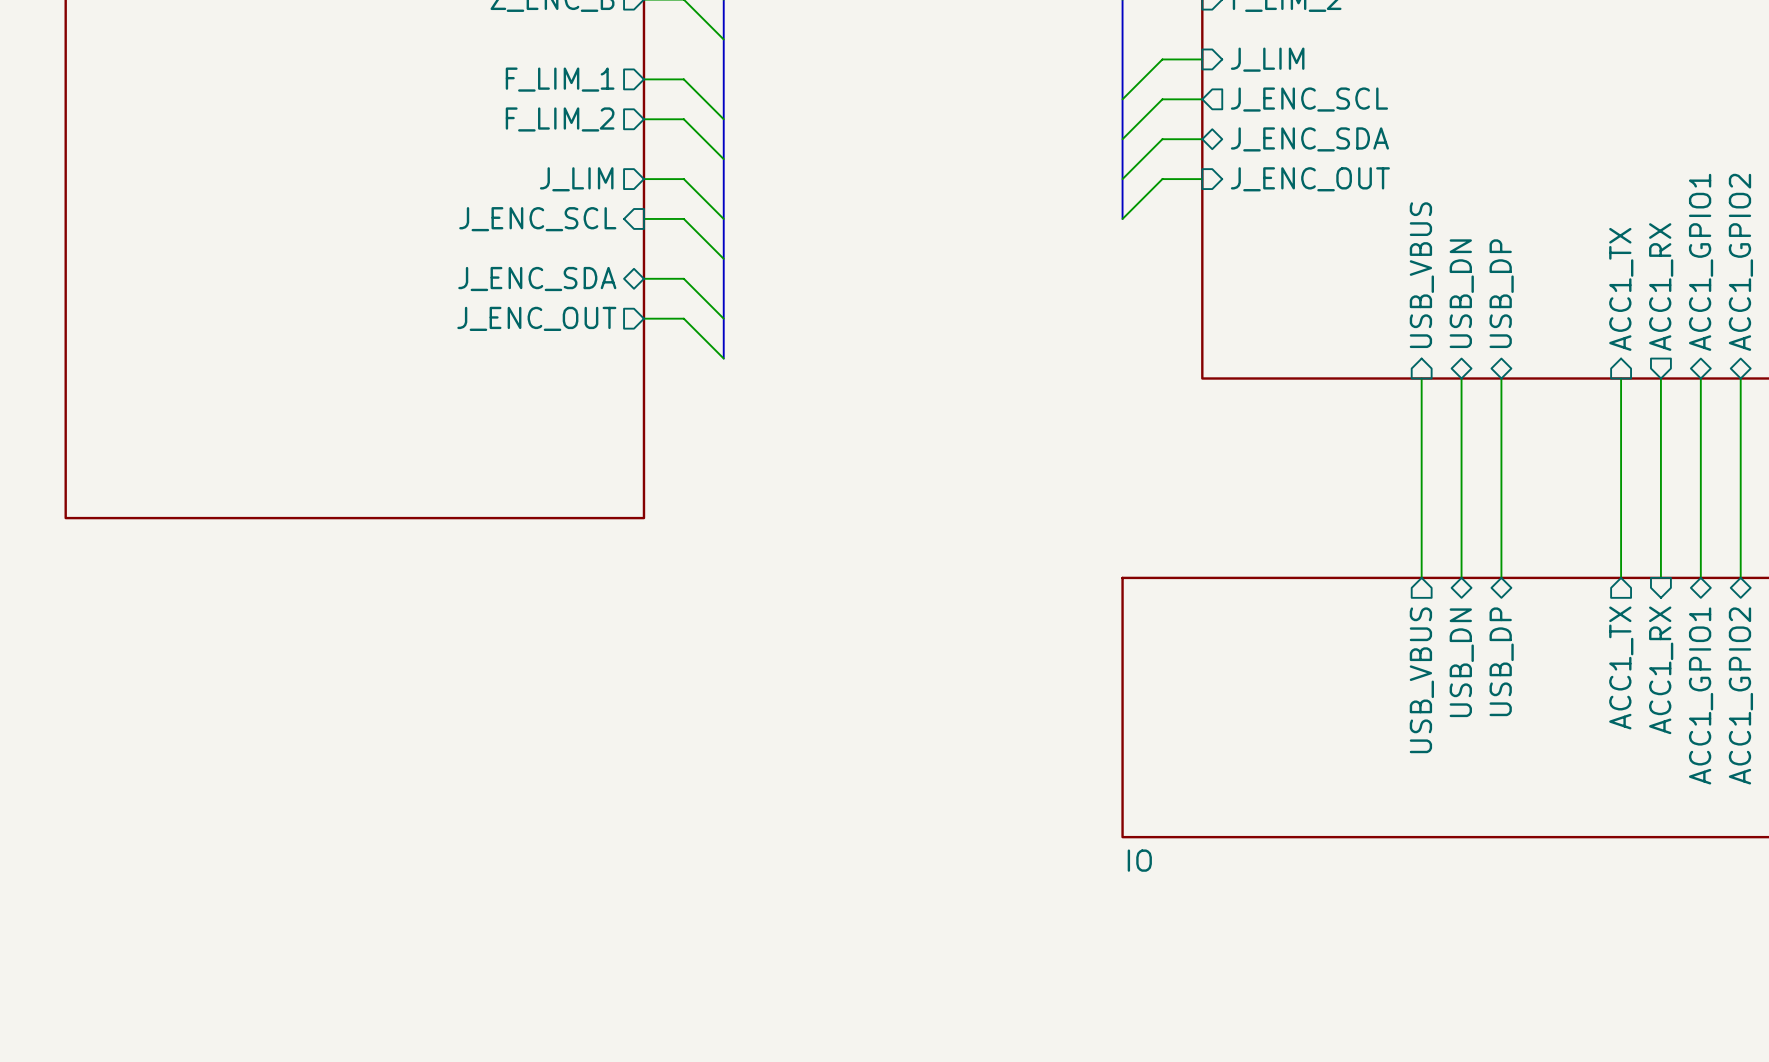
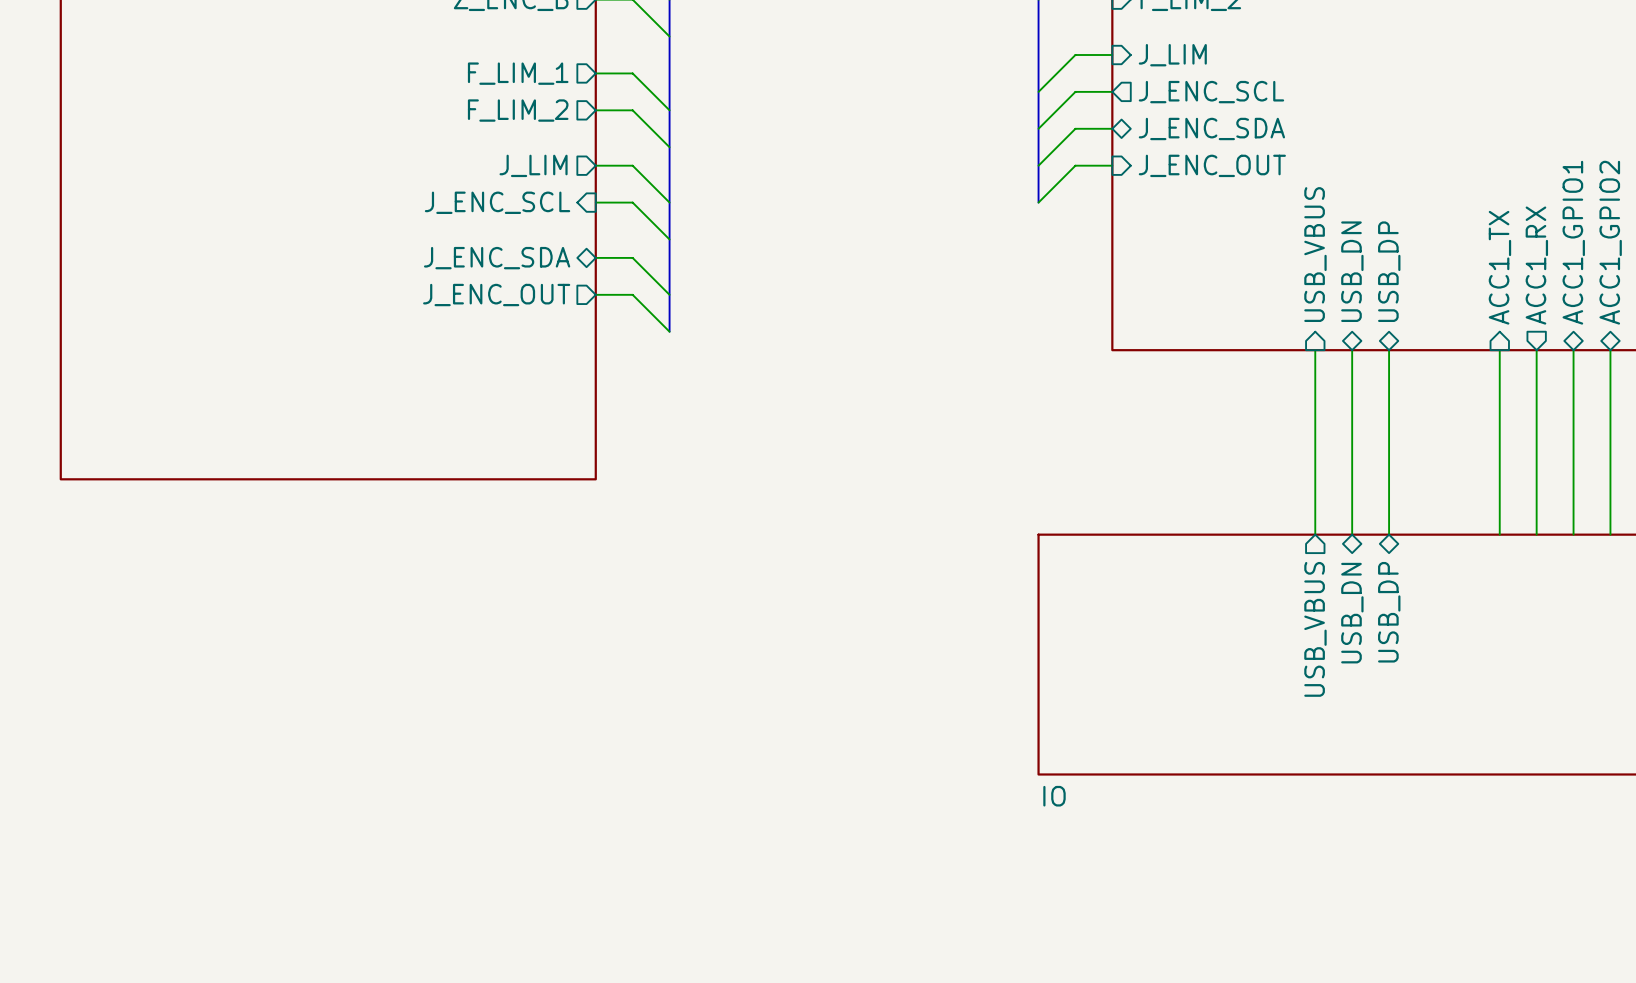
sheet pin: ACC1_TX (1621, 667) -> none
sheet pin: ACC1_RX (1661, 670) -> none
sheet pin: ACC1_GPIO1 (1701, 695) -> none
sheet pin: ACC1_GPIO2 (1740, 695) -> none

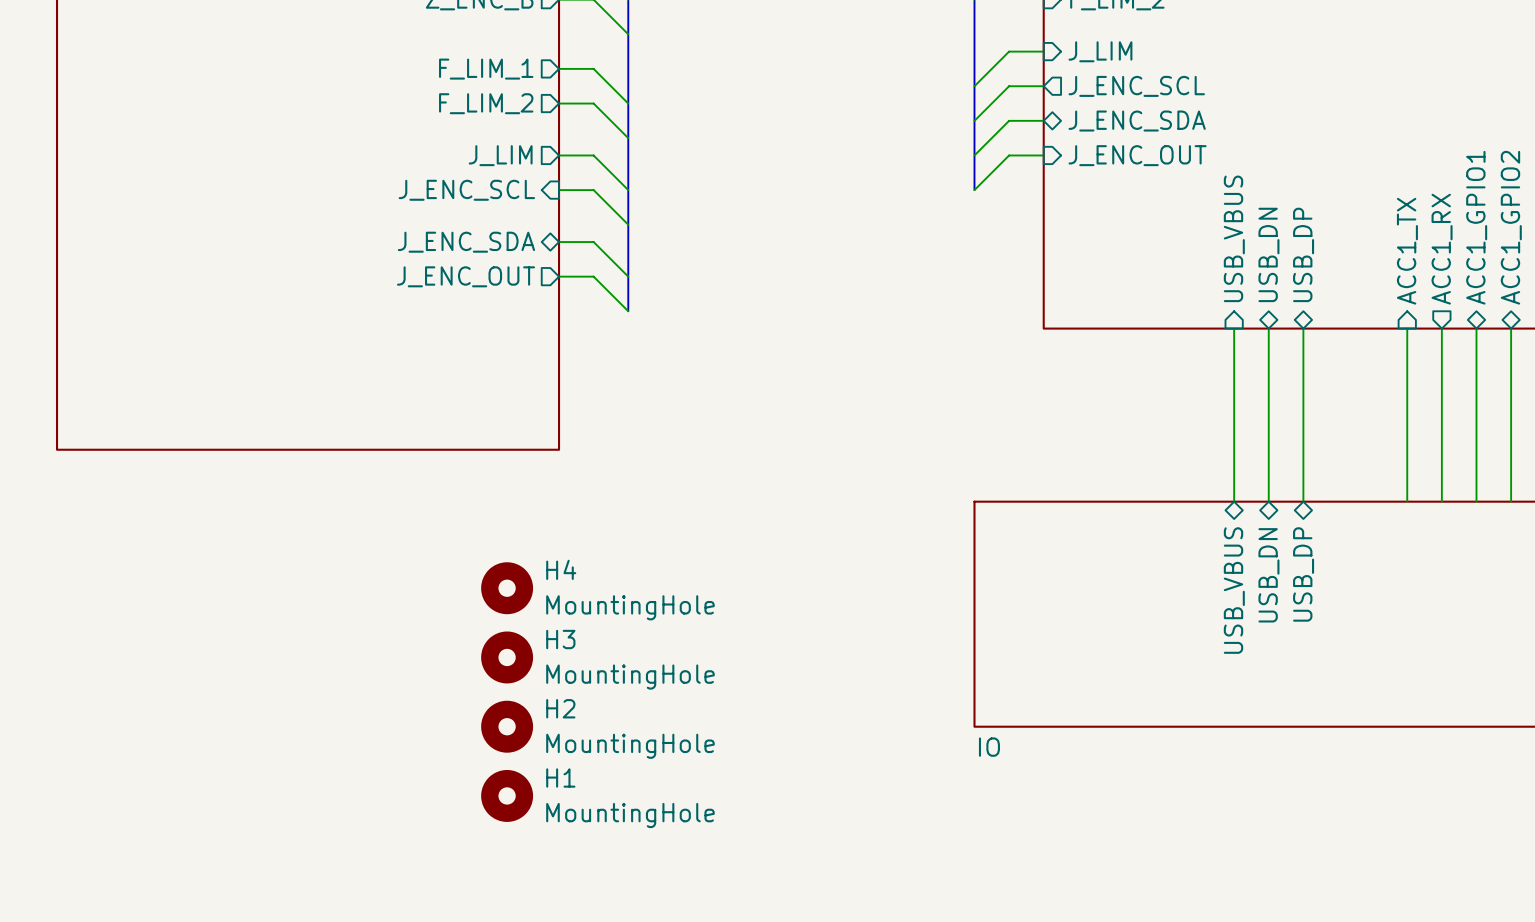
H4: none -> MountingHole (507, 588)
sheet pin shape: output (1315, 629) -> bidirectional (1234, 590)
H3: none -> MountingHole (507, 657)
H2: none -> MountingHole (507, 726)
H1: none -> MountingHole (507, 795)

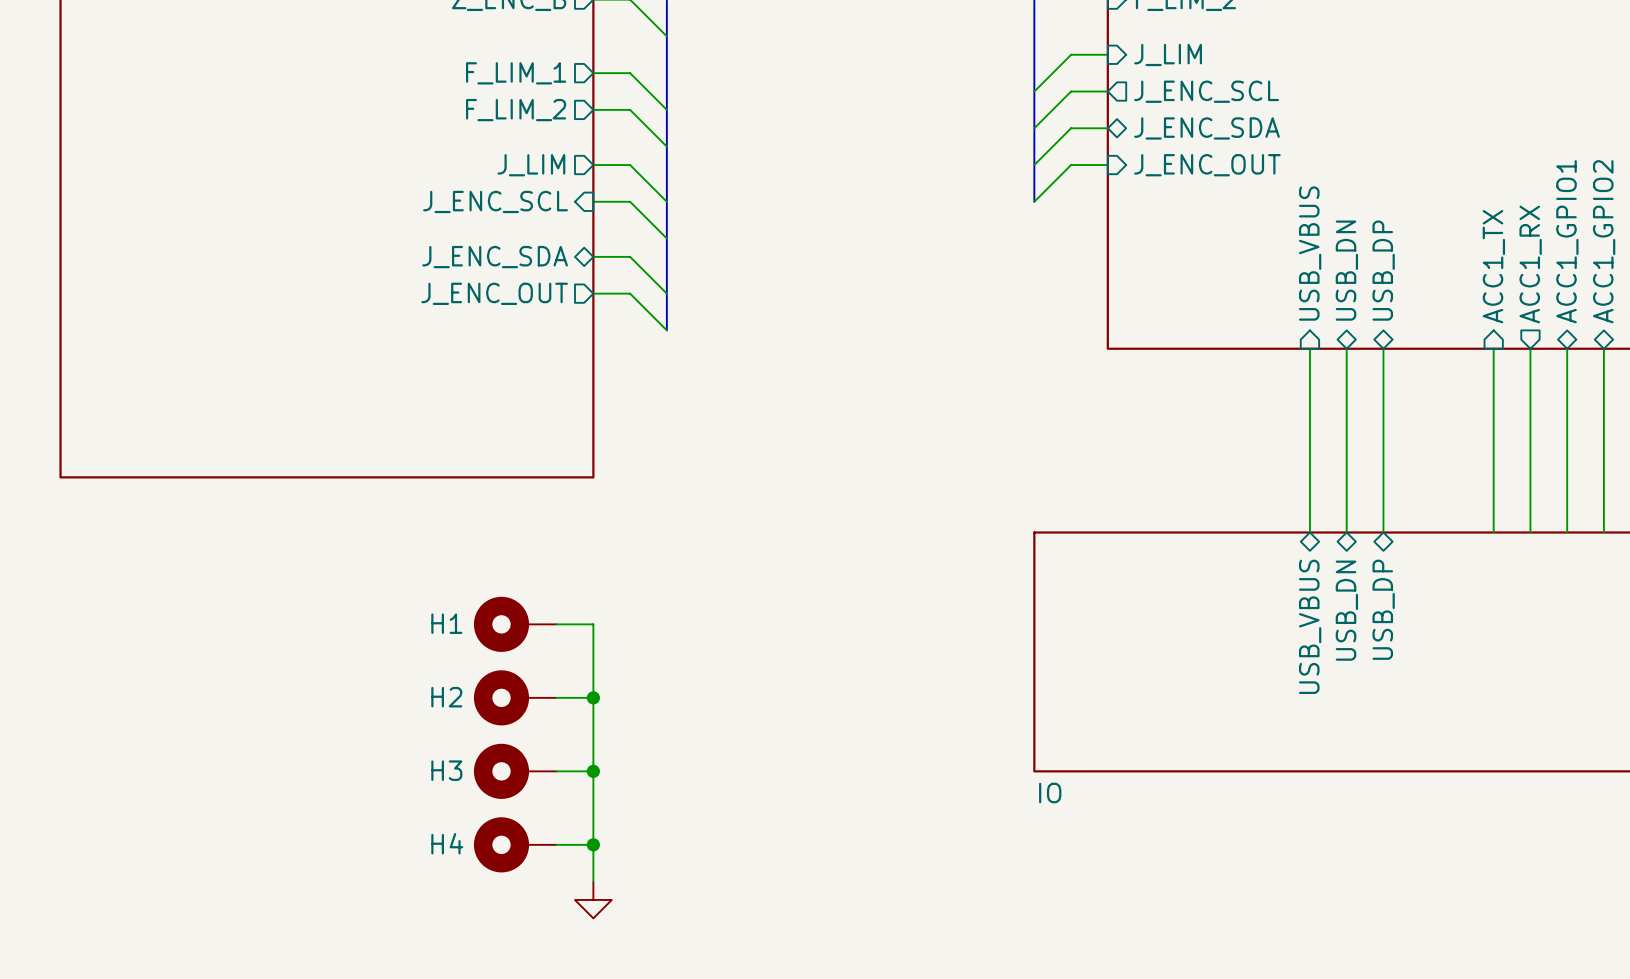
H4 symbol: [481, 562, 534, 615] -> [473, 817, 557, 873]
H4 name position: H4 (561, 569) -> H4 (447, 843)
wire: none -> (556, 624) (593, 624) (593, 881)
H4 value: MountingHole (630, 607) -> none
H3 symbol: [481, 631, 534, 684] -> [473, 743, 557, 799]
H3 name position: H3 (560, 639) -> H3 (446, 770)
wire: none -> (556, 697) (593, 697)
junction: none -> (593, 697)
H3 value: MountingHole (630, 677) -> none
H2 symbol: [481, 700, 534, 753] -> [473, 670, 557, 726]
H2 name position: H2 (560, 708) -> H2 (446, 697)
wire: none -> (556, 771) (593, 771)
junction: none -> (593, 771)
H2 value: MountingHole (630, 746) -> none
H1 symbol: [481, 769, 534, 822] -> [473, 596, 557, 652]
H1 name position: H1 (560, 778) -> H1 (446, 623)
wire: none -> (556, 844) (593, 844)
junction: none -> (593, 844)
H1 value: MountingHole (630, 815) -> none
power symbol: none -> (593, 899)

